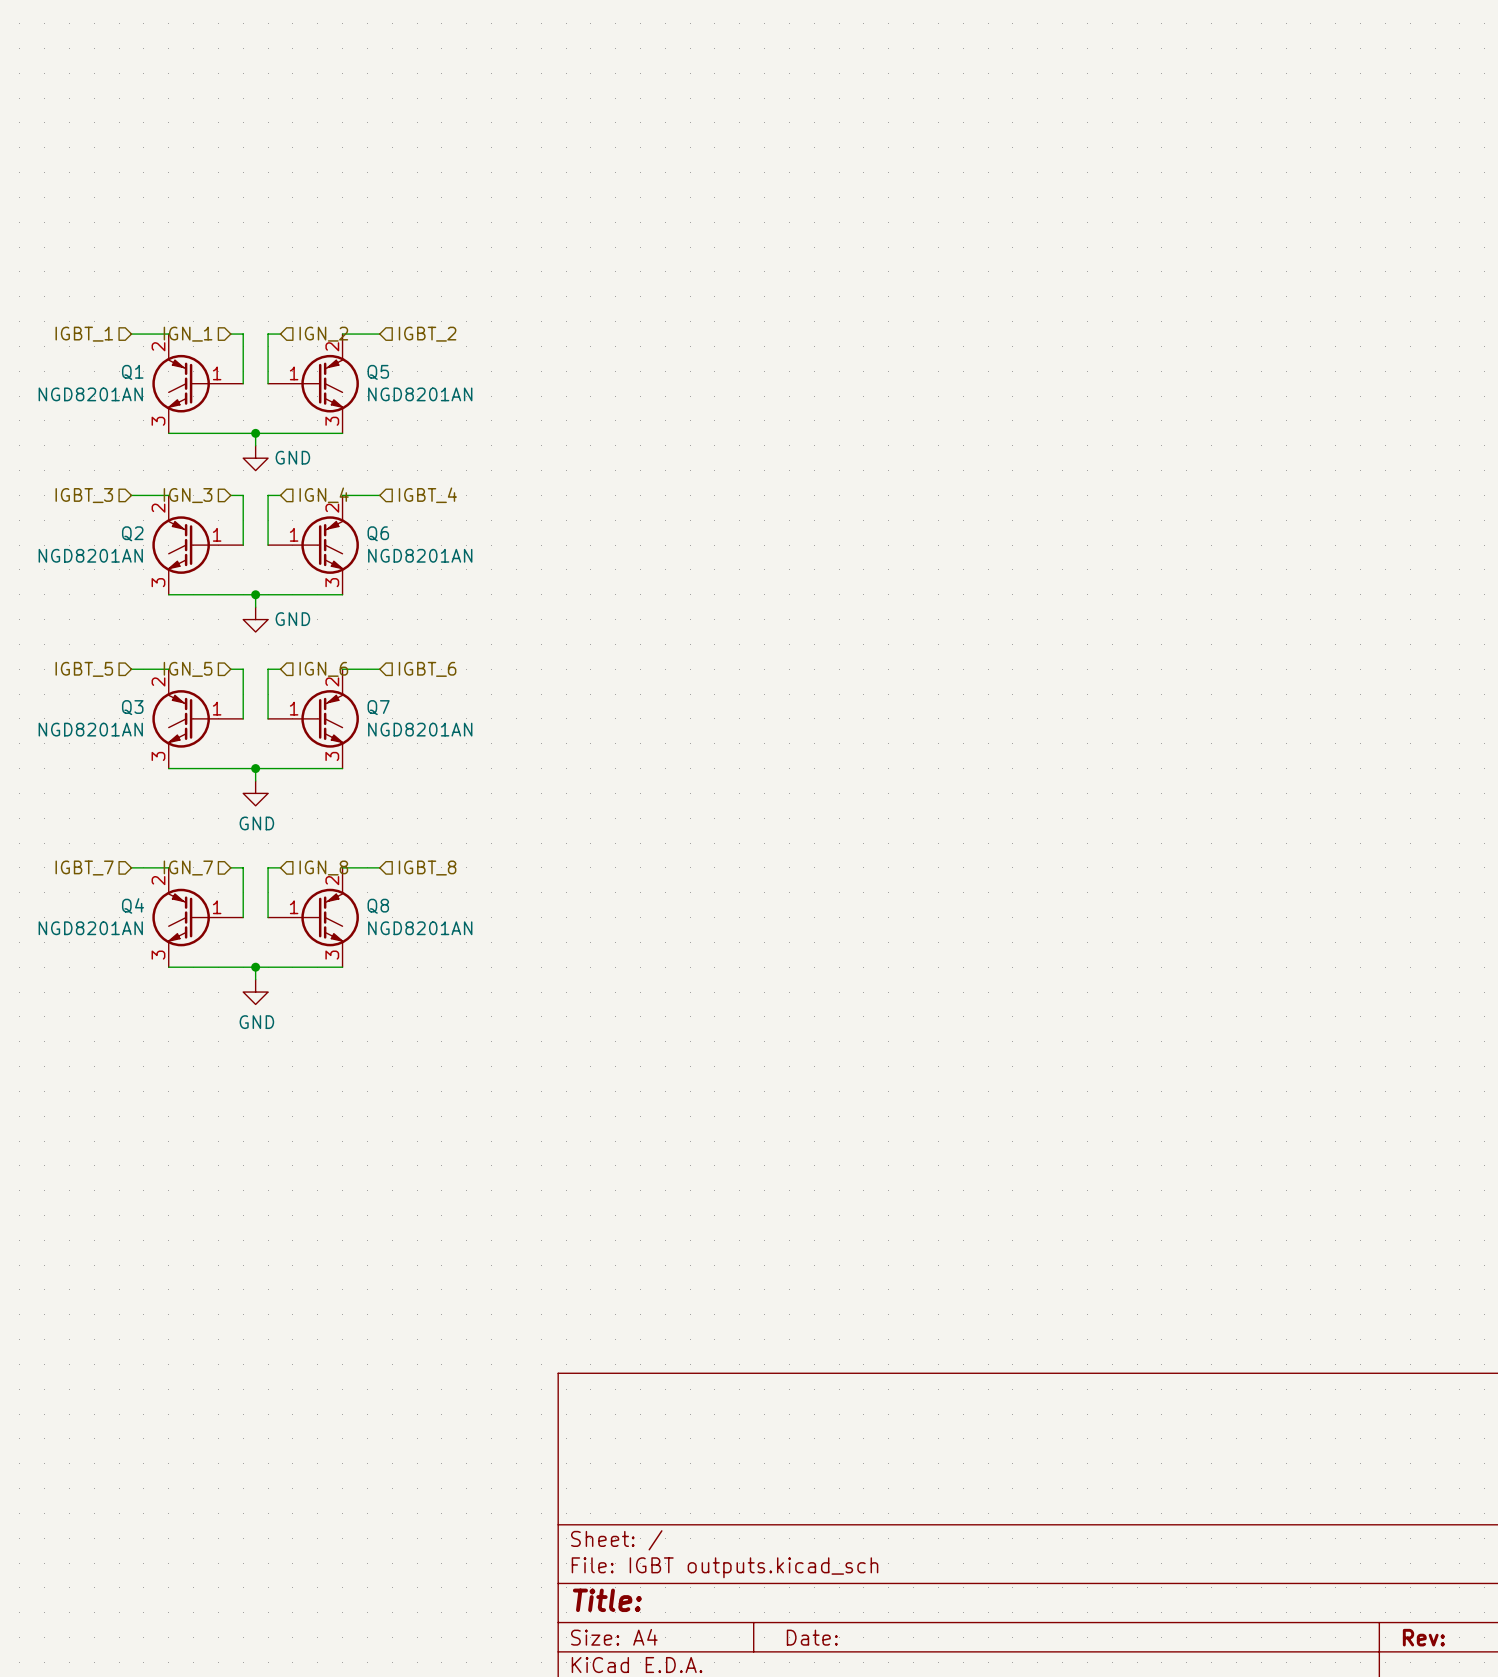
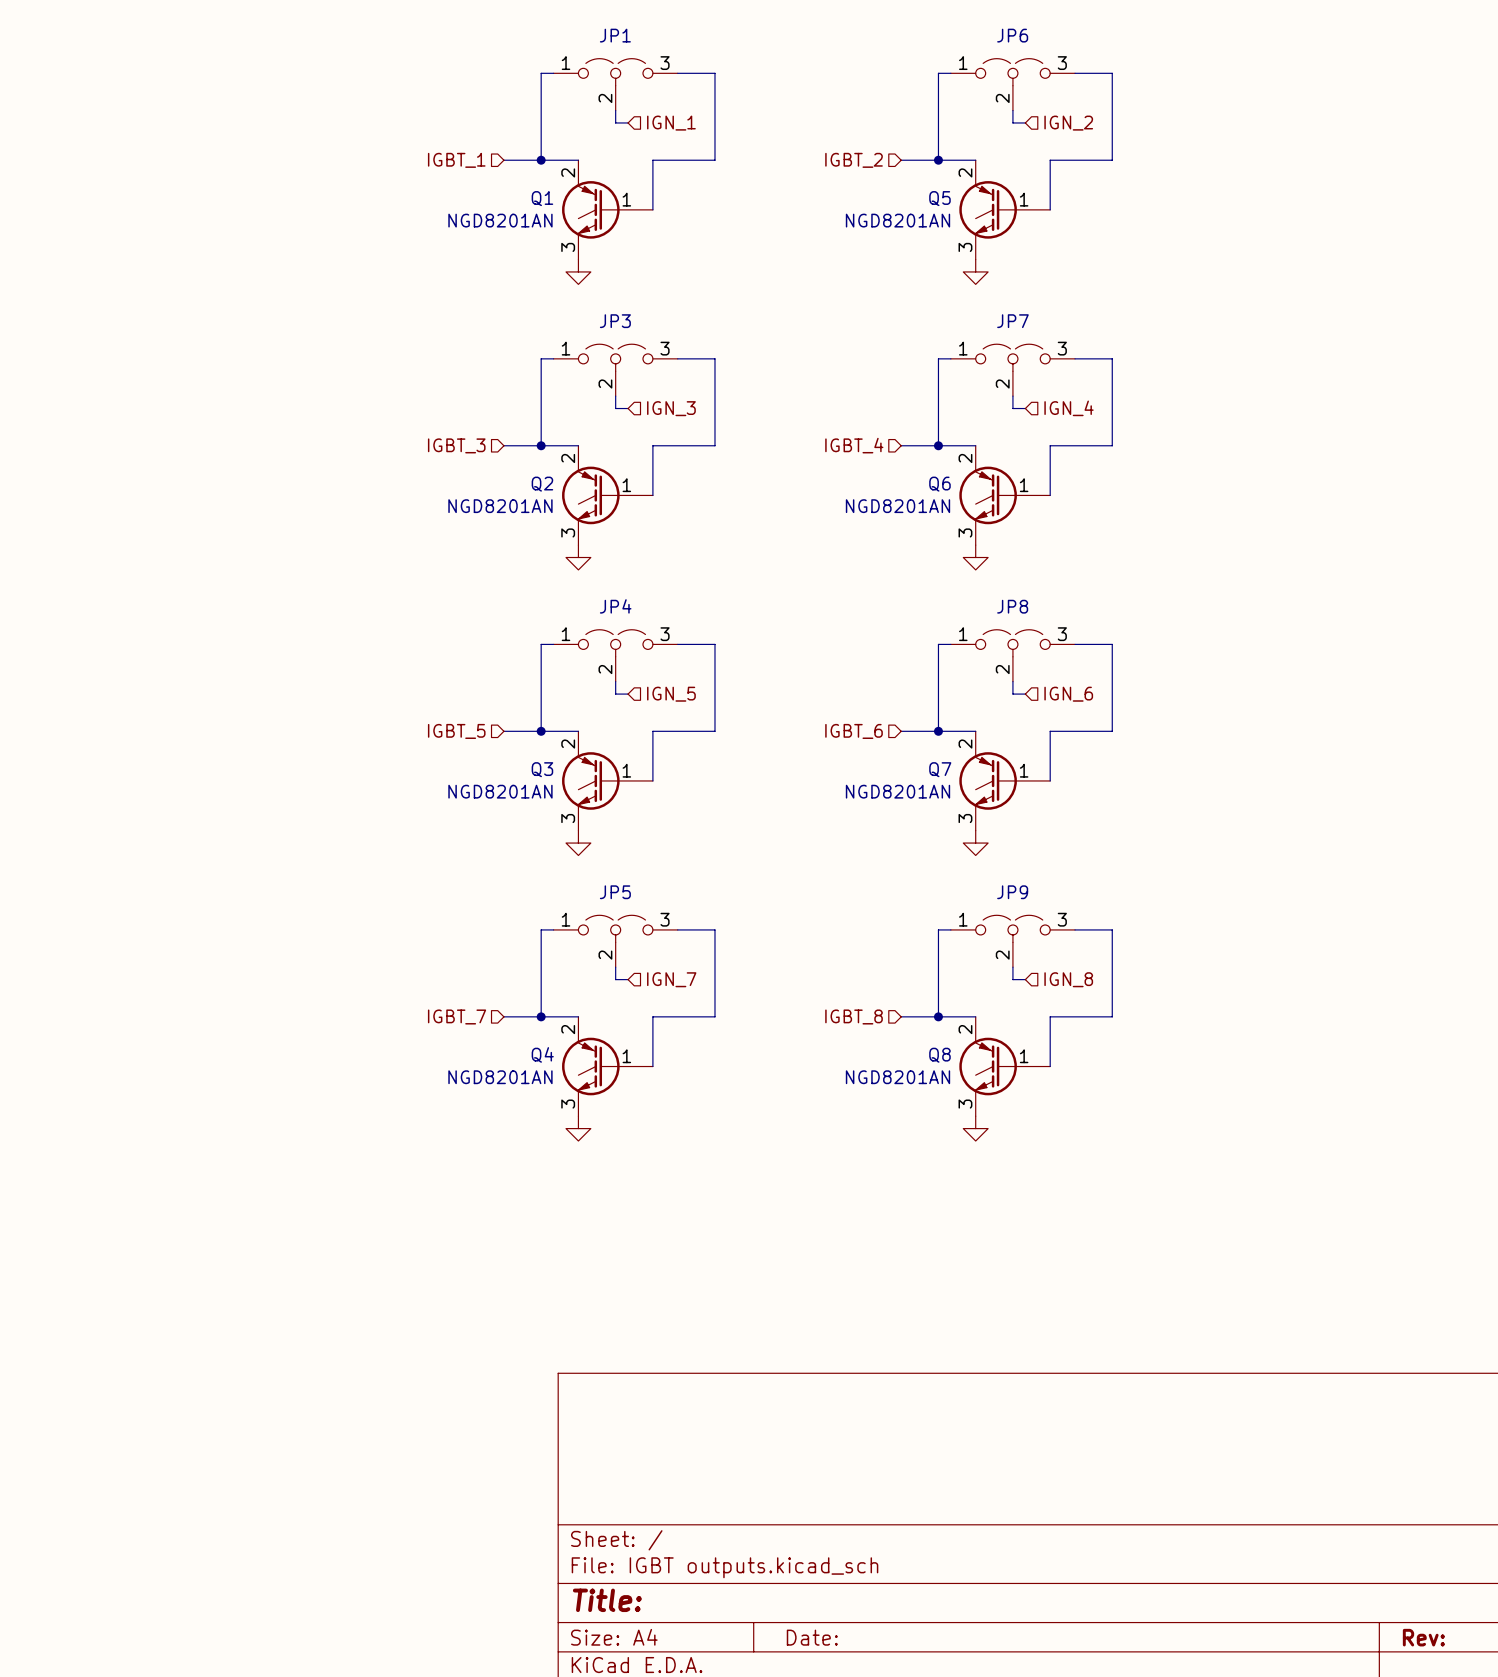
wire: none -> (553, 73) (541, 73) (541, 160)
wire: none -> (677, 73) (714, 73) (714, 160) (652, 160) (652, 209)
wire: none -> (950, 73) (938, 73) (938, 160)
wire: none -> (1075, 73) (1112, 73) (1112, 160) (1050, 160) (1050, 209)
JP1: none -> (615, 84)
JP6: none -> (1012, 84)
wire: none -> (615, 110) (615, 122) (628, 122)
wire: none -> (1012, 110) (1012, 122) (1025, 122)
hierarchical label: none -> IGN_1 (671, 123)
hierarchical label: none -> IGN_2 (1068, 123)
hierarchical label: none -> IGBT_1 (456, 160)
wire: none -> (503, 160) (578, 160)
junction: none -> (541, 160)
hierarchical label: none -> IGBT_2 (854, 160)
wire: none -> (901, 160) (975, 160)
junction: none -> (938, 160)
power symbol: none -> (578, 271)
power symbol: none -> (975, 271)
hierarchical label: IGBT_1 (84, 334) -> none
wire: (131, 334) (168, 334) -> none
hierarchical label: IGN_1 (188, 334) -> none
wire: (230, 334) (243, 334) (243, 383) -> none
wire: (280, 334) (268, 334) (268, 383) -> none
hierarchical label: IGN_2 (323, 334) -> none
wire: (342, 334) (379, 334) -> none
hierarchical label: IGBT_2 (427, 334) -> none
wire: none -> (553, 358) (541, 358) (541, 445)
wire: none -> (677, 358) (714, 358) (714, 445) (652, 445) (652, 495)
wire: none -> (950, 358) (938, 358) (938, 445)
wire: none -> (1075, 358) (1112, 358) (1112, 445) (1050, 445) (1050, 495)
JP3: none -> (615, 370)
JP7: none -> (1012, 370)
Q1 position: (197, 383) -> (607, 209)
Q5 position: (313, 383) -> (1004, 209)
Q5 flip: as is (330, 383) -> left-right (988, 209)
wire: none -> (615, 396) (615, 408) (628, 408)
wire: none -> (1012, 396) (1012, 408) (1025, 408)
hierarchical label: none -> IGN_3 (671, 408)
hierarchical label: none -> IGN_4 (1069, 408)
wire: (168, 433) (342, 433) -> none
wire: (255, 433) (255, 445) -> none
junction: (255, 433) -> none
hierarchical label: none -> IGBT_3 (456, 445)
wire: none -> (503, 445) (578, 445)
junction: none -> (541, 445)
hierarchical label: none -> IGBT_4 (854, 445)
wire: none -> (901, 445) (975, 445)
junction: none -> (938, 445)
power symbol: GND (255, 458) -> none
hierarchical label: IGBT_3 (84, 495) -> none
wire: (131, 495) (168, 495) -> none
hierarchical label: IGN_3 (188, 495) -> none
wire: (230, 495) (243, 495) (243, 545) -> none
wire: (280, 495) (268, 495) (268, 545) -> none
hierarchical label: IGN_4 (324, 495) -> none
wire: (342, 495) (379, 495) -> none
hierarchical label: IGBT_4 (427, 495) -> none
Q2 position: (197, 545) -> (607, 495)
Q6 position: (313, 545) -> (1004, 495)
Q6 flip: as is (330, 545) -> left-right (988, 495)
power symbol: none -> (578, 557)
power symbol: none -> (975, 557)
wire: (168, 594) (342, 594) -> none
wire: (255, 594) (255, 607) -> none
junction: (255, 594) -> none
power symbol: GND (255, 619) -> none
wire: none -> (553, 644) (541, 644) (541, 731)
wire: none -> (677, 644) (714, 644) (714, 731) (652, 731) (652, 780)
wire: none -> (950, 644) (938, 644) (938, 731)
wire: none -> (1075, 644) (1112, 644) (1112, 731) (1050, 731) (1050, 780)
JP4: none -> (615, 655)
JP8: none -> (1012, 655)
hierarchical label: IGBT_5 (84, 669) -> none
wire: (131, 669) (168, 669) -> none
hierarchical label: IGN_5 (188, 669) -> none
wire: (230, 669) (243, 669) (243, 718) -> none
wire: (280, 669) (268, 669) (268, 718) -> none
hierarchical label: IGN_6 (323, 669) -> none
wire: (342, 669) (379, 669) -> none
hierarchical label: IGBT_6 (427, 669) -> none
wire: none -> (615, 681) (615, 694) (628, 694)
wire: none -> (1012, 681) (1012, 694) (1025, 694)
hierarchical label: none -> IGN_5 (671, 694)
hierarchical label: none -> IGN_6 (1068, 694)
Q3 position: (197, 718) -> (607, 780)
Q7 position: (313, 718) -> (1004, 780)
Q7 flip: as is (330, 718) -> left-right (988, 780)
hierarchical label: none -> IGBT_5 (456, 731)
wire: none -> (503, 731) (578, 731)
junction: none -> (541, 731)
hierarchical label: none -> IGBT_6 (854, 731)
wire: none -> (901, 731) (975, 731)
junction: none -> (938, 731)
wire: (168, 768) (342, 768) -> none
wire: (255, 768) (255, 780) -> none
junction: (255, 768) -> none
power symbol: GND (255, 793) -> none
power symbol: none -> (578, 843)
power symbol: none -> (975, 843)
wire: (131, 867) (168, 867) -> none
wire: (230, 867) (243, 867) (243, 917) -> none
wire: (280, 867) (268, 867) (268, 917) -> none
wire: (342, 867) (379, 867) -> none
hierarchical label: IGBT_7 (84, 868) -> none
hierarchical label: IGN_7 (188, 868) -> none
hierarchical label: IGN_8 (323, 868) -> none
hierarchical label: IGBT_8 (427, 868) -> none
Q4 position: (197, 917) -> (607, 1066)
Q8 position: (313, 917) -> (1004, 1066)
Q8 flip: as is (330, 917) -> left-right (988, 1066)
wire: none -> (553, 929) (541, 929) (541, 1016)
wire: none -> (677, 929) (714, 929) (714, 1016) (652, 1016) (652, 1066)
wire: none -> (950, 929) (938, 929) (938, 1016)
wire: none -> (1075, 929) (1112, 929) (1112, 1016) (1050, 1016) (1050, 1066)
JP5: none -> (615, 941)
JP9: none -> (1012, 941)
wire: (168, 967) (342, 967) -> none
wire: (255, 967) (255, 979) -> none
junction: (255, 967) -> none
wire: none -> (615, 967) (615, 979) (628, 979)
wire: none -> (1012, 967) (1012, 979) (1025, 979)
hierarchical label: none -> IGN_7 (671, 979)
hierarchical label: none -> IGN_8 (1068, 979)
power symbol: GND (255, 992) -> none
hierarchical label: none -> IGBT_7 (457, 1016)
wire: none -> (503, 1016) (578, 1016)
junction: none -> (541, 1016)
hierarchical label: none -> IGBT_8 (854, 1016)
wire: none -> (901, 1016) (975, 1016)
junction: none -> (938, 1016)
power symbol: none -> (578, 1128)
power symbol: none -> (975, 1128)

